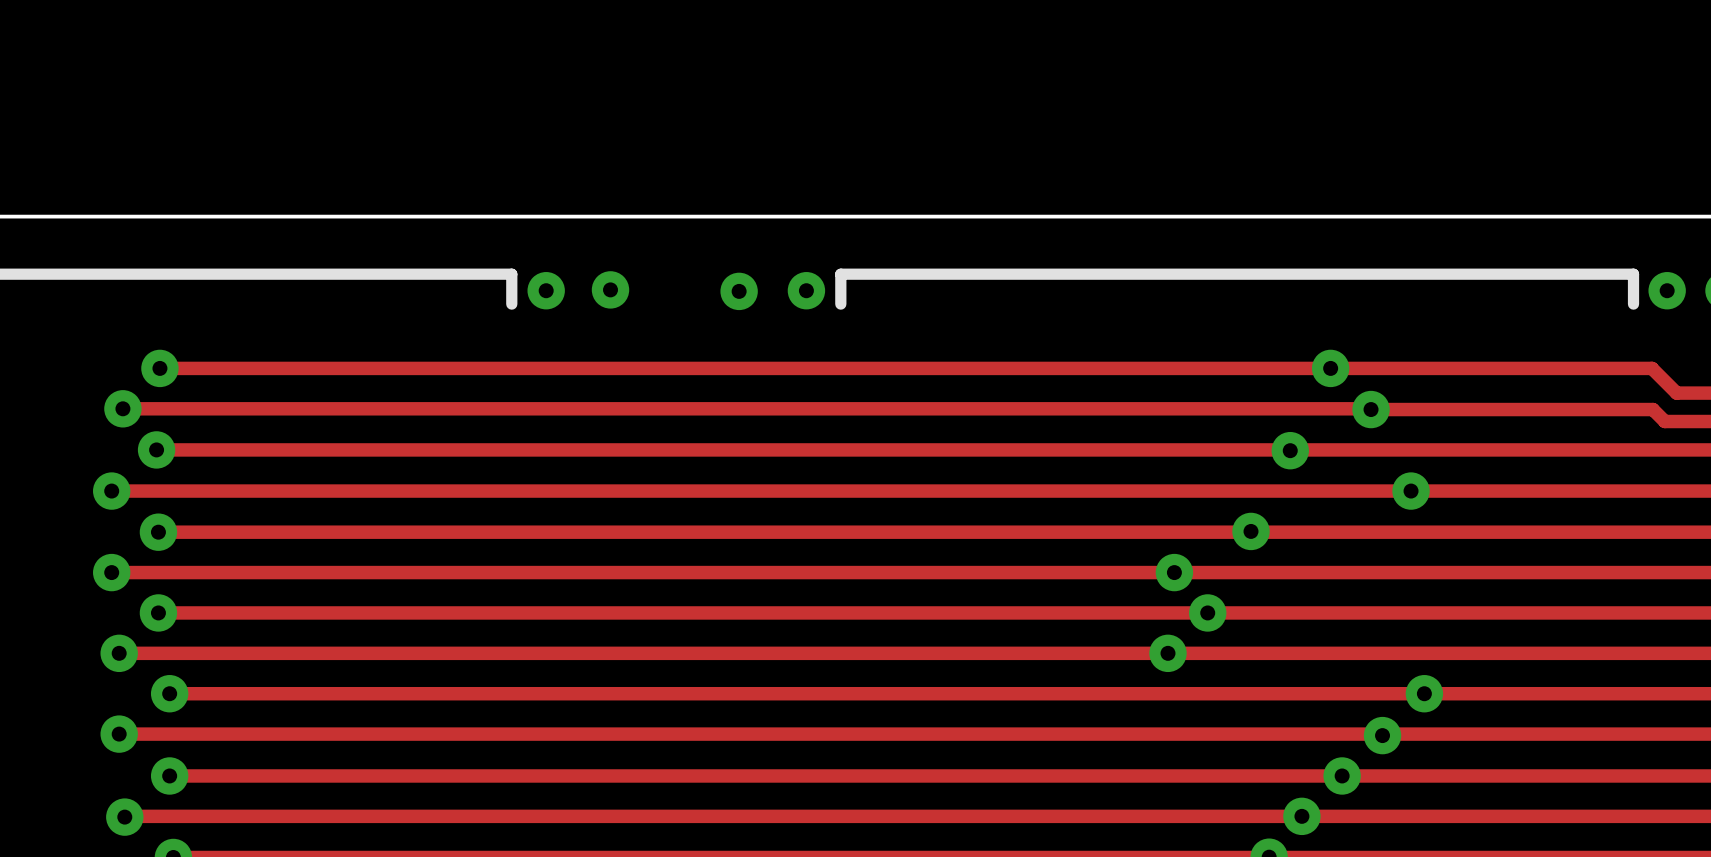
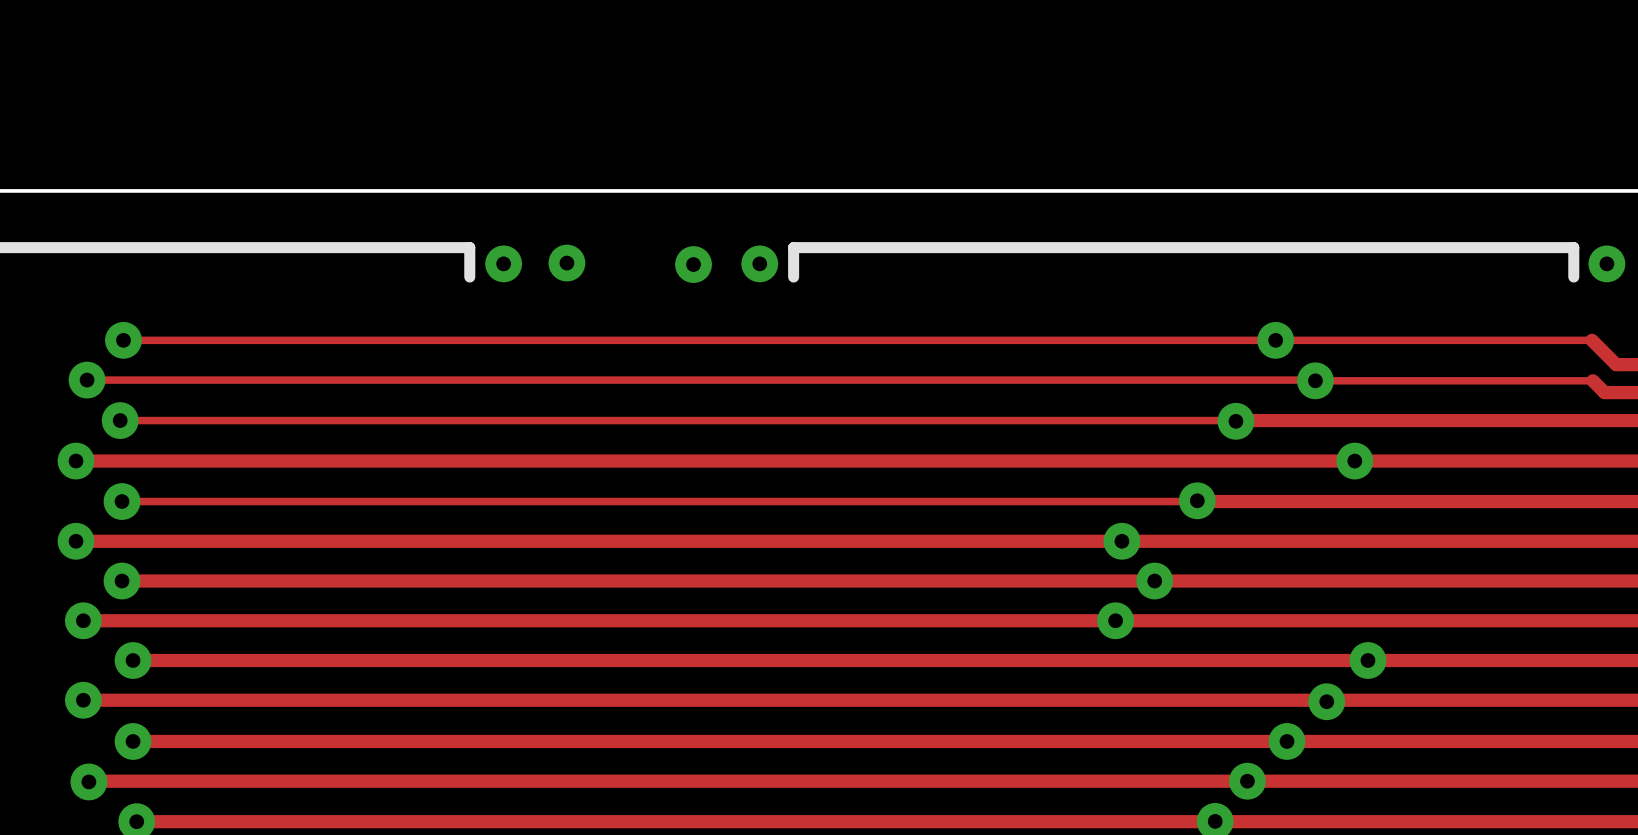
track width: thick (159, 368) (1652, 368) -> thin (123, 340) (1591, 340)
track width: thick (122, 408) (1370, 408) -> thin (87, 380) (1314, 380)
track width: thick (1372, 408) (1371, 409) (1652, 409) -> thin (1316, 379) (1315, 380) (1592, 380)
track width: thick (156, 449) (1289, 449) -> thin (120, 420) (1235, 420)
track width: thick (158, 532) (1250, 532) -> thin (122, 501) (1196, 501)

